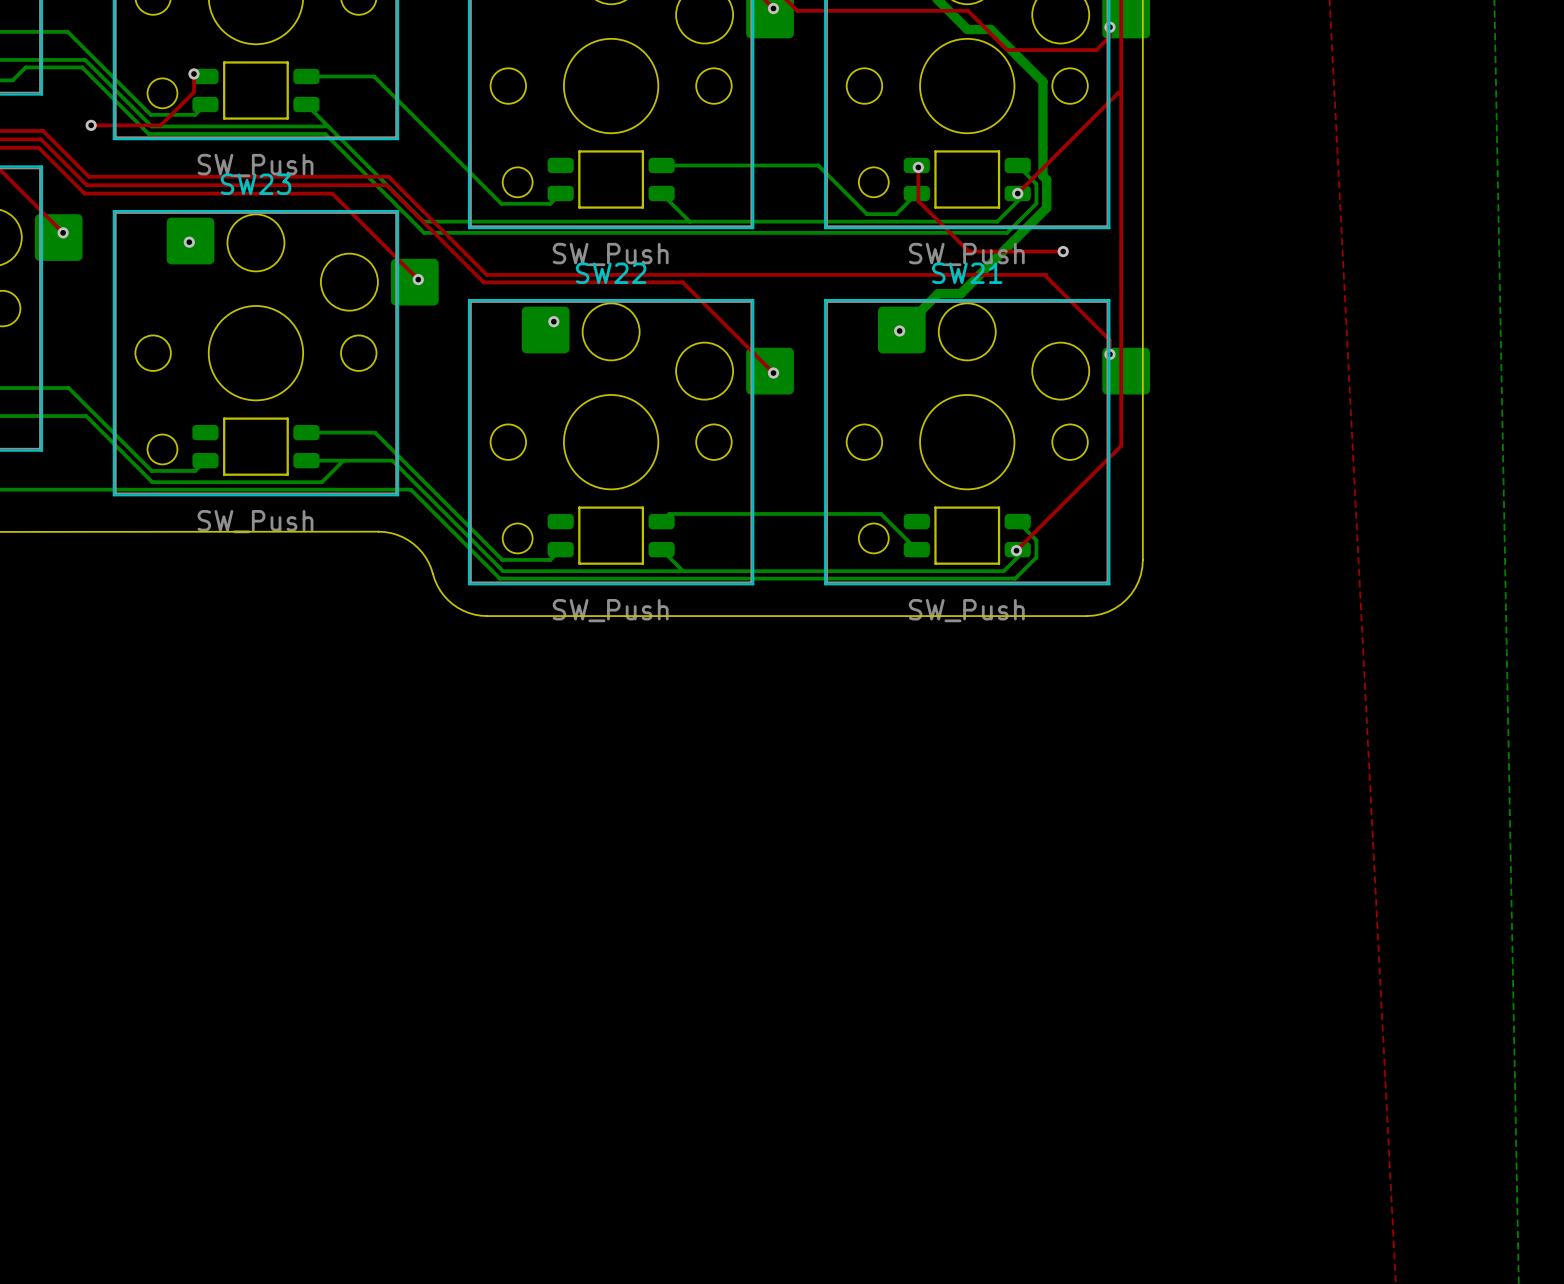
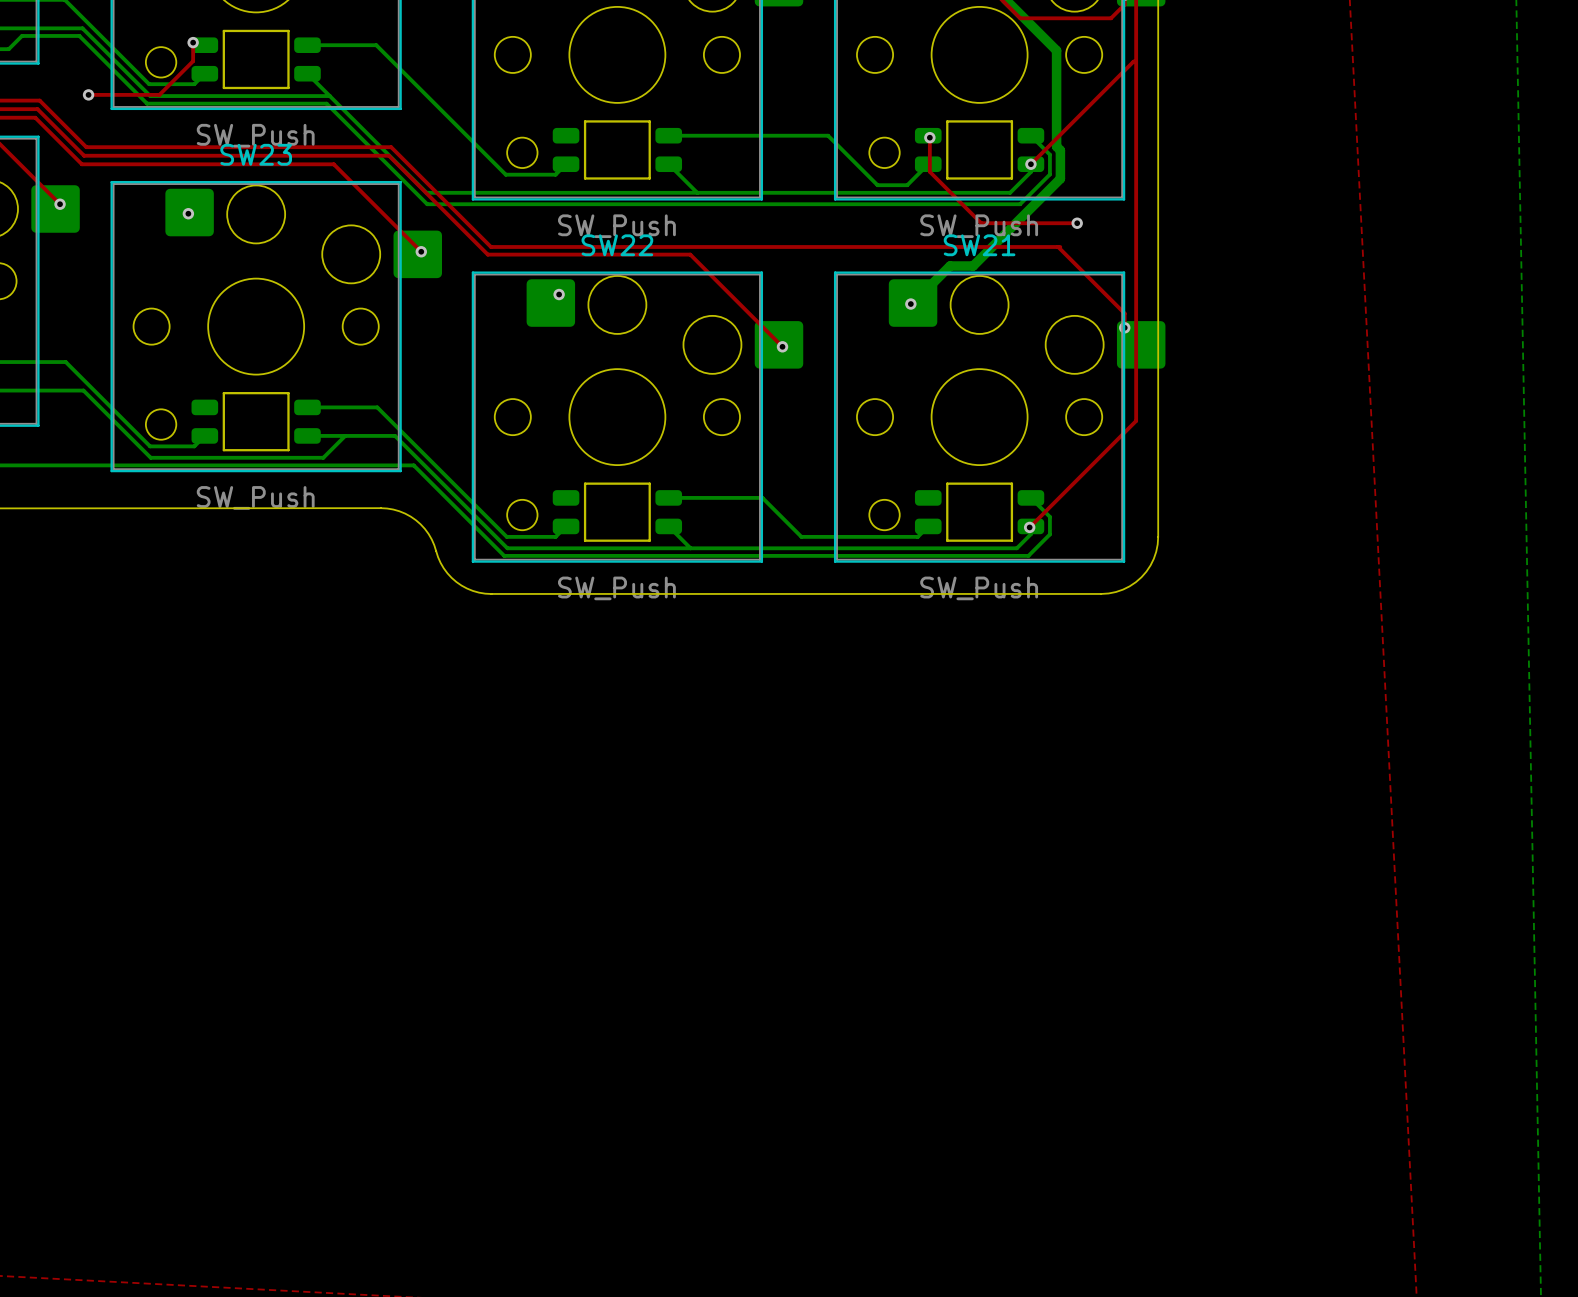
bottom track: (661, 521) (669, 513) (881, 513) (916, 549) -> (668, 497) (762, 497) (801, 536) (917, 536) (928, 526)

